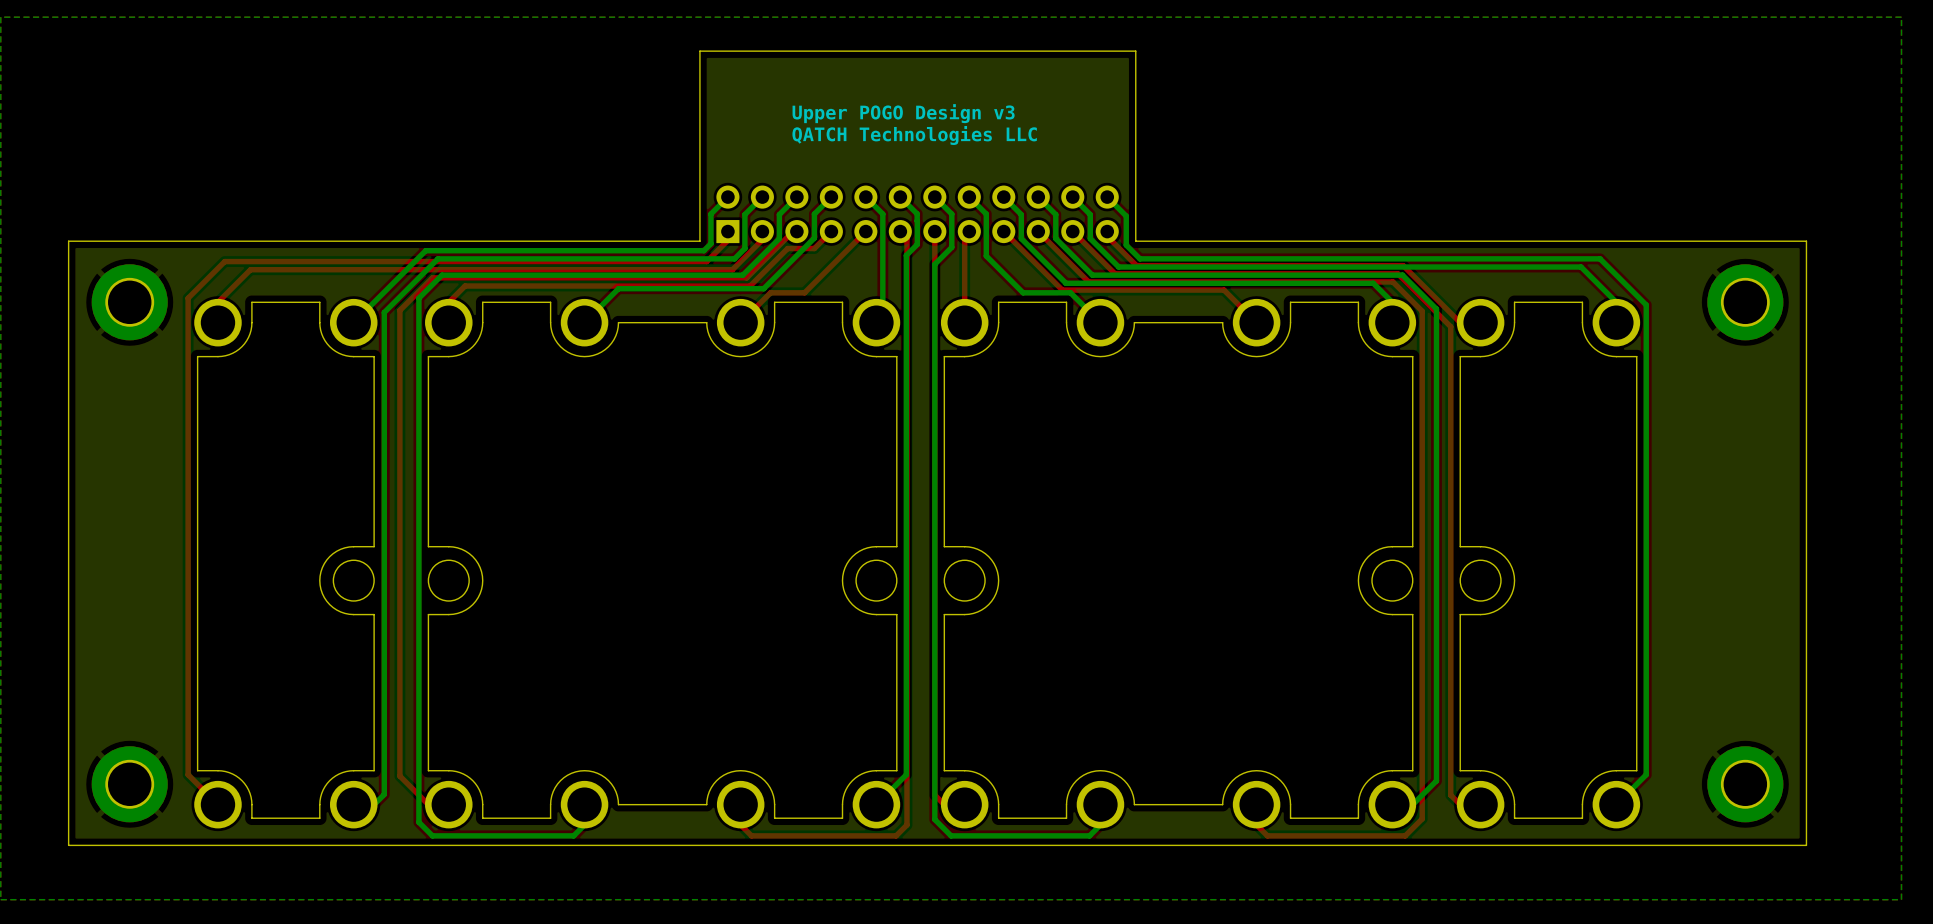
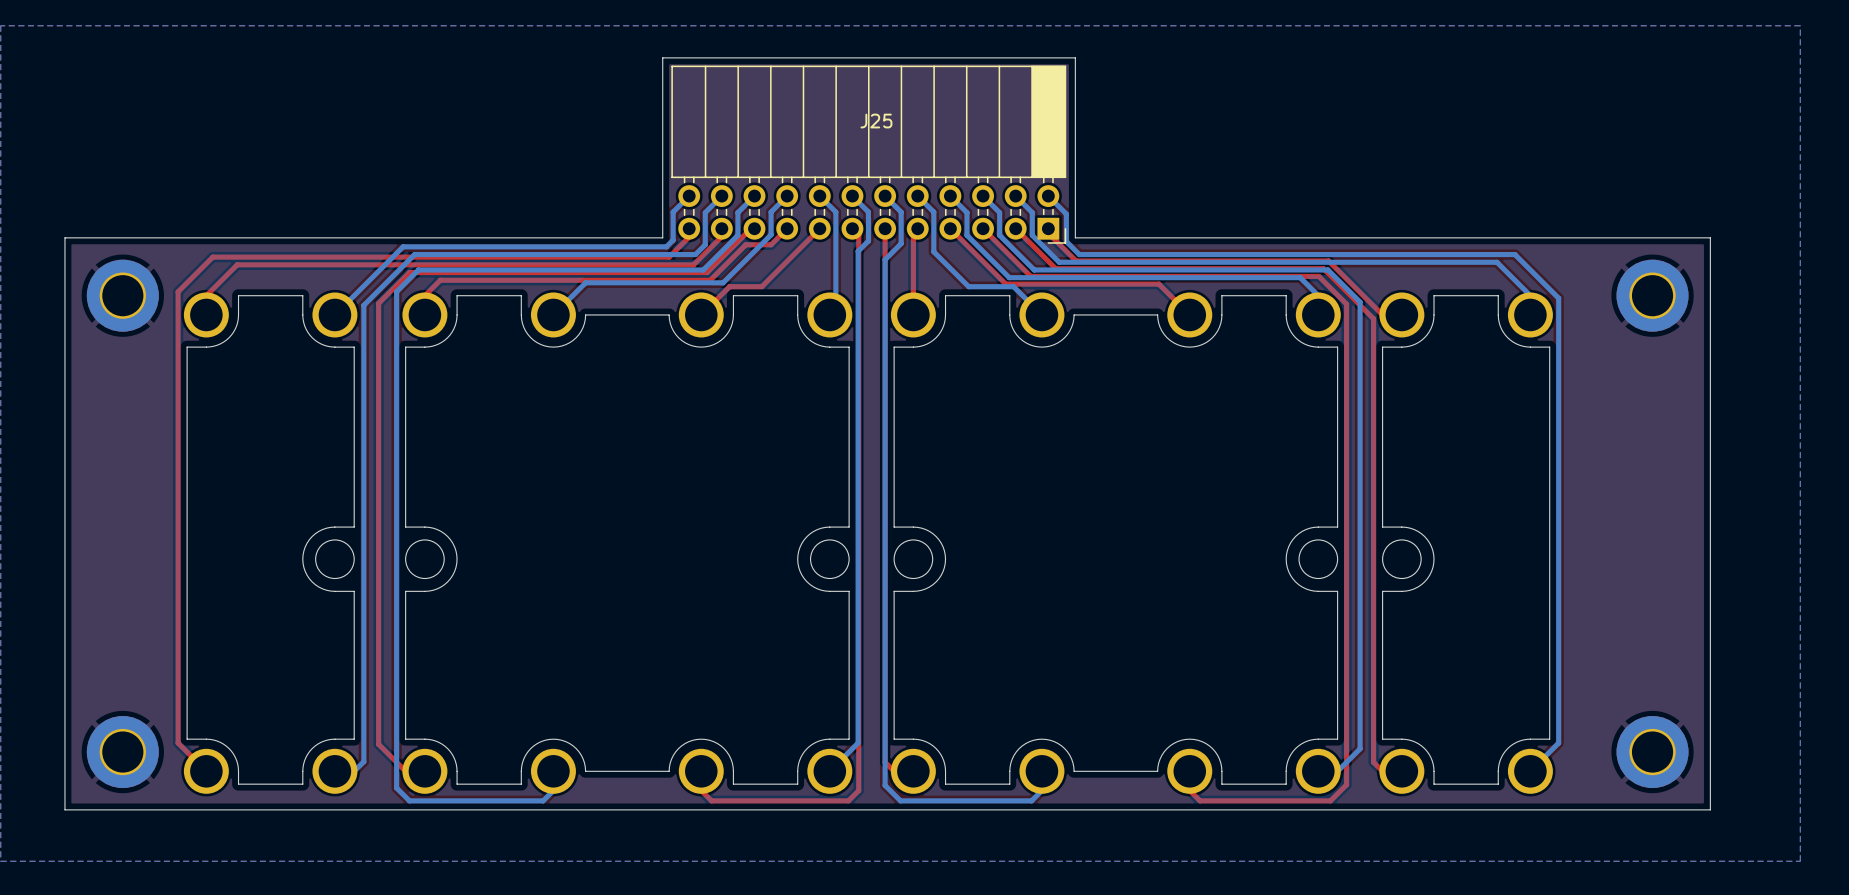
text: Upper POGO Design v3 (903, 113) -> none
text: QATCH Technologies LLC (914, 135) -> none
J25 side: top (917, 214) -> bottom (868, 154)

